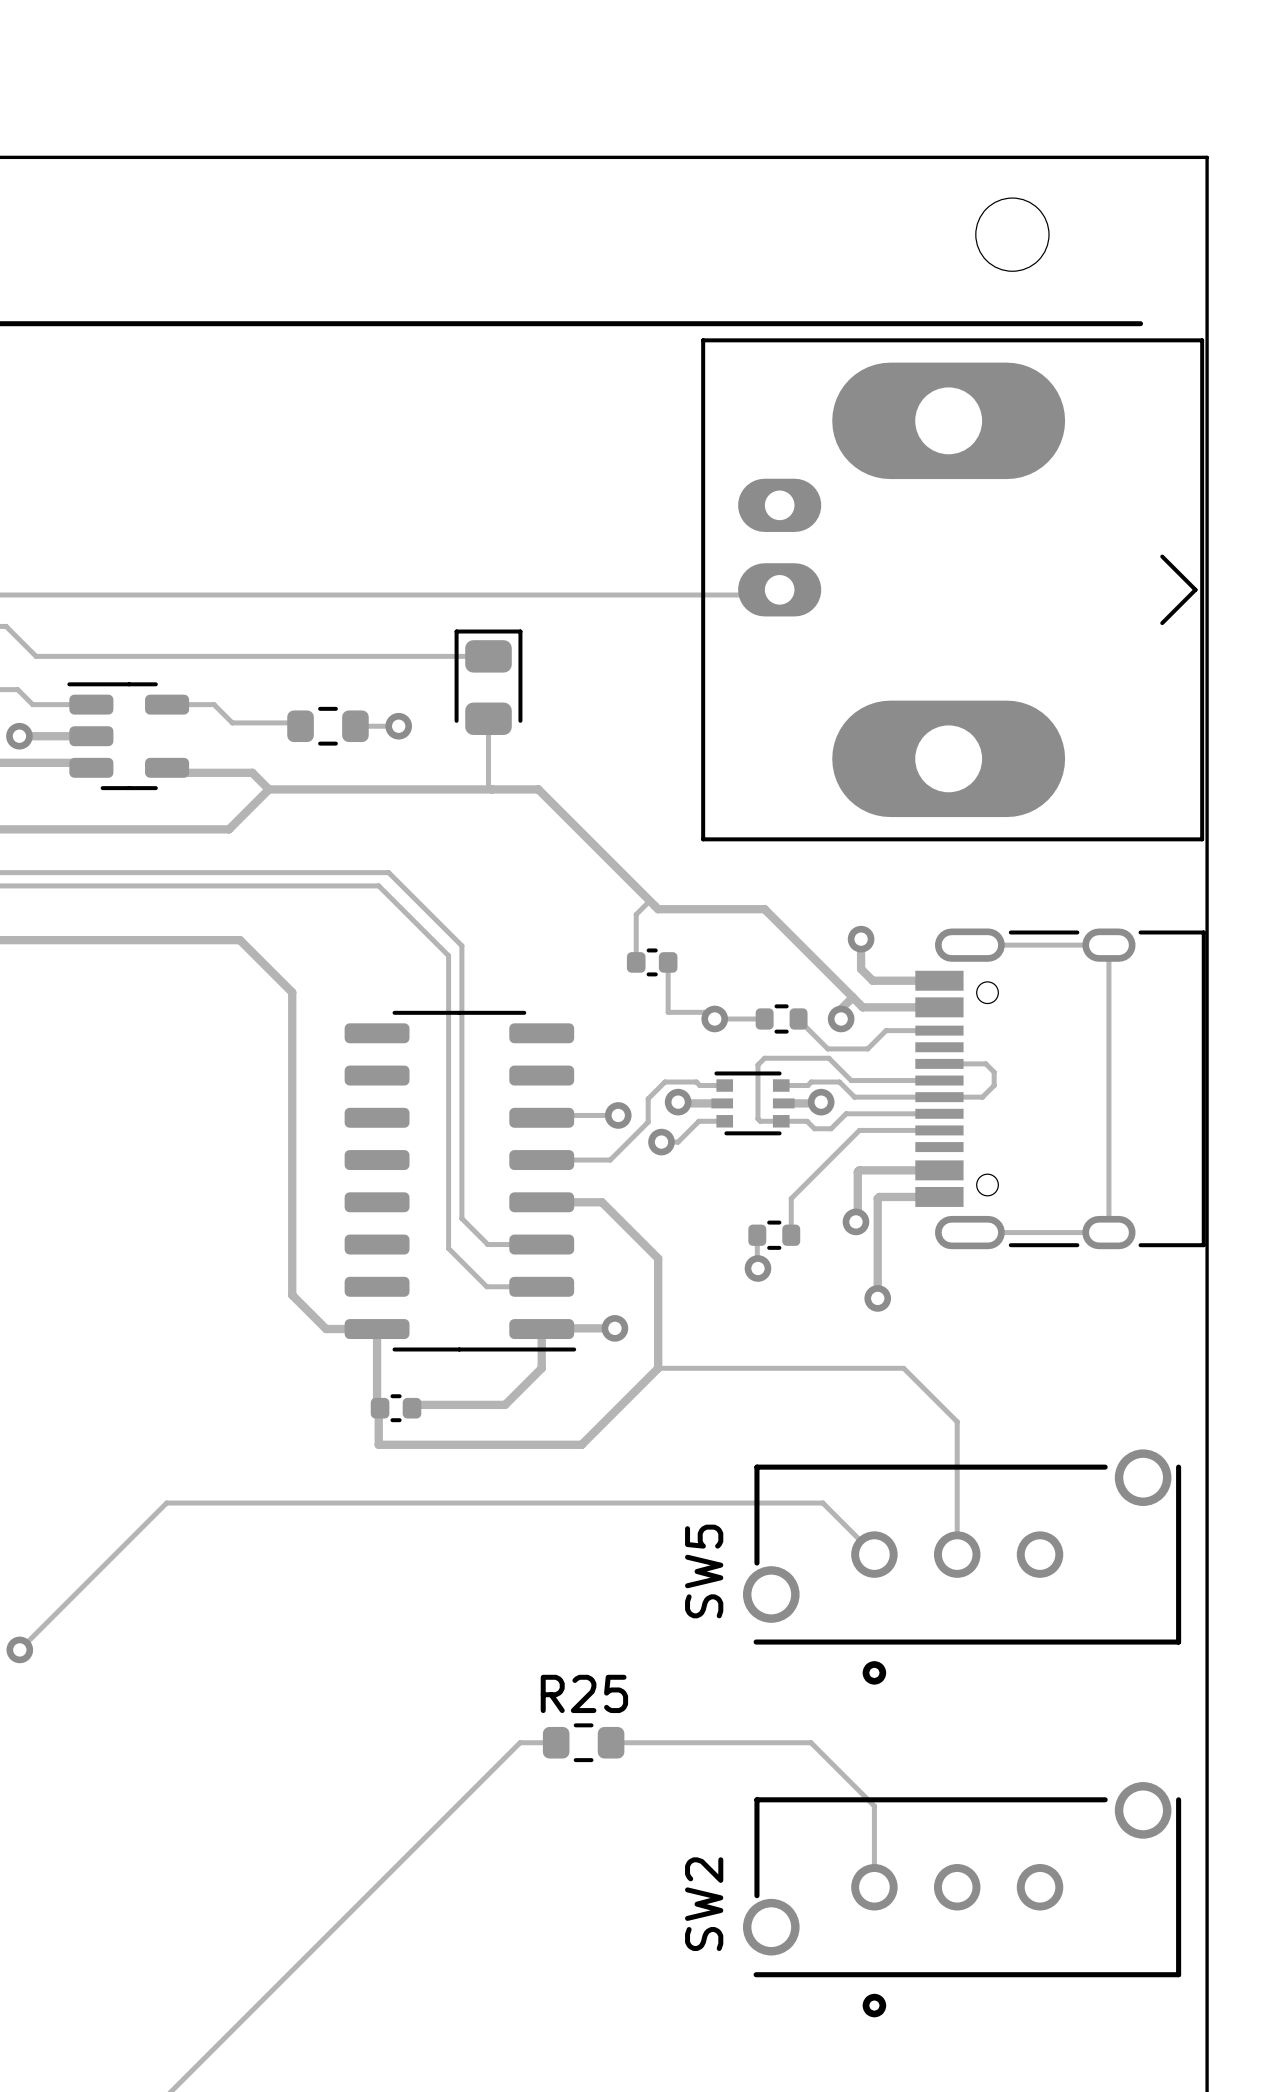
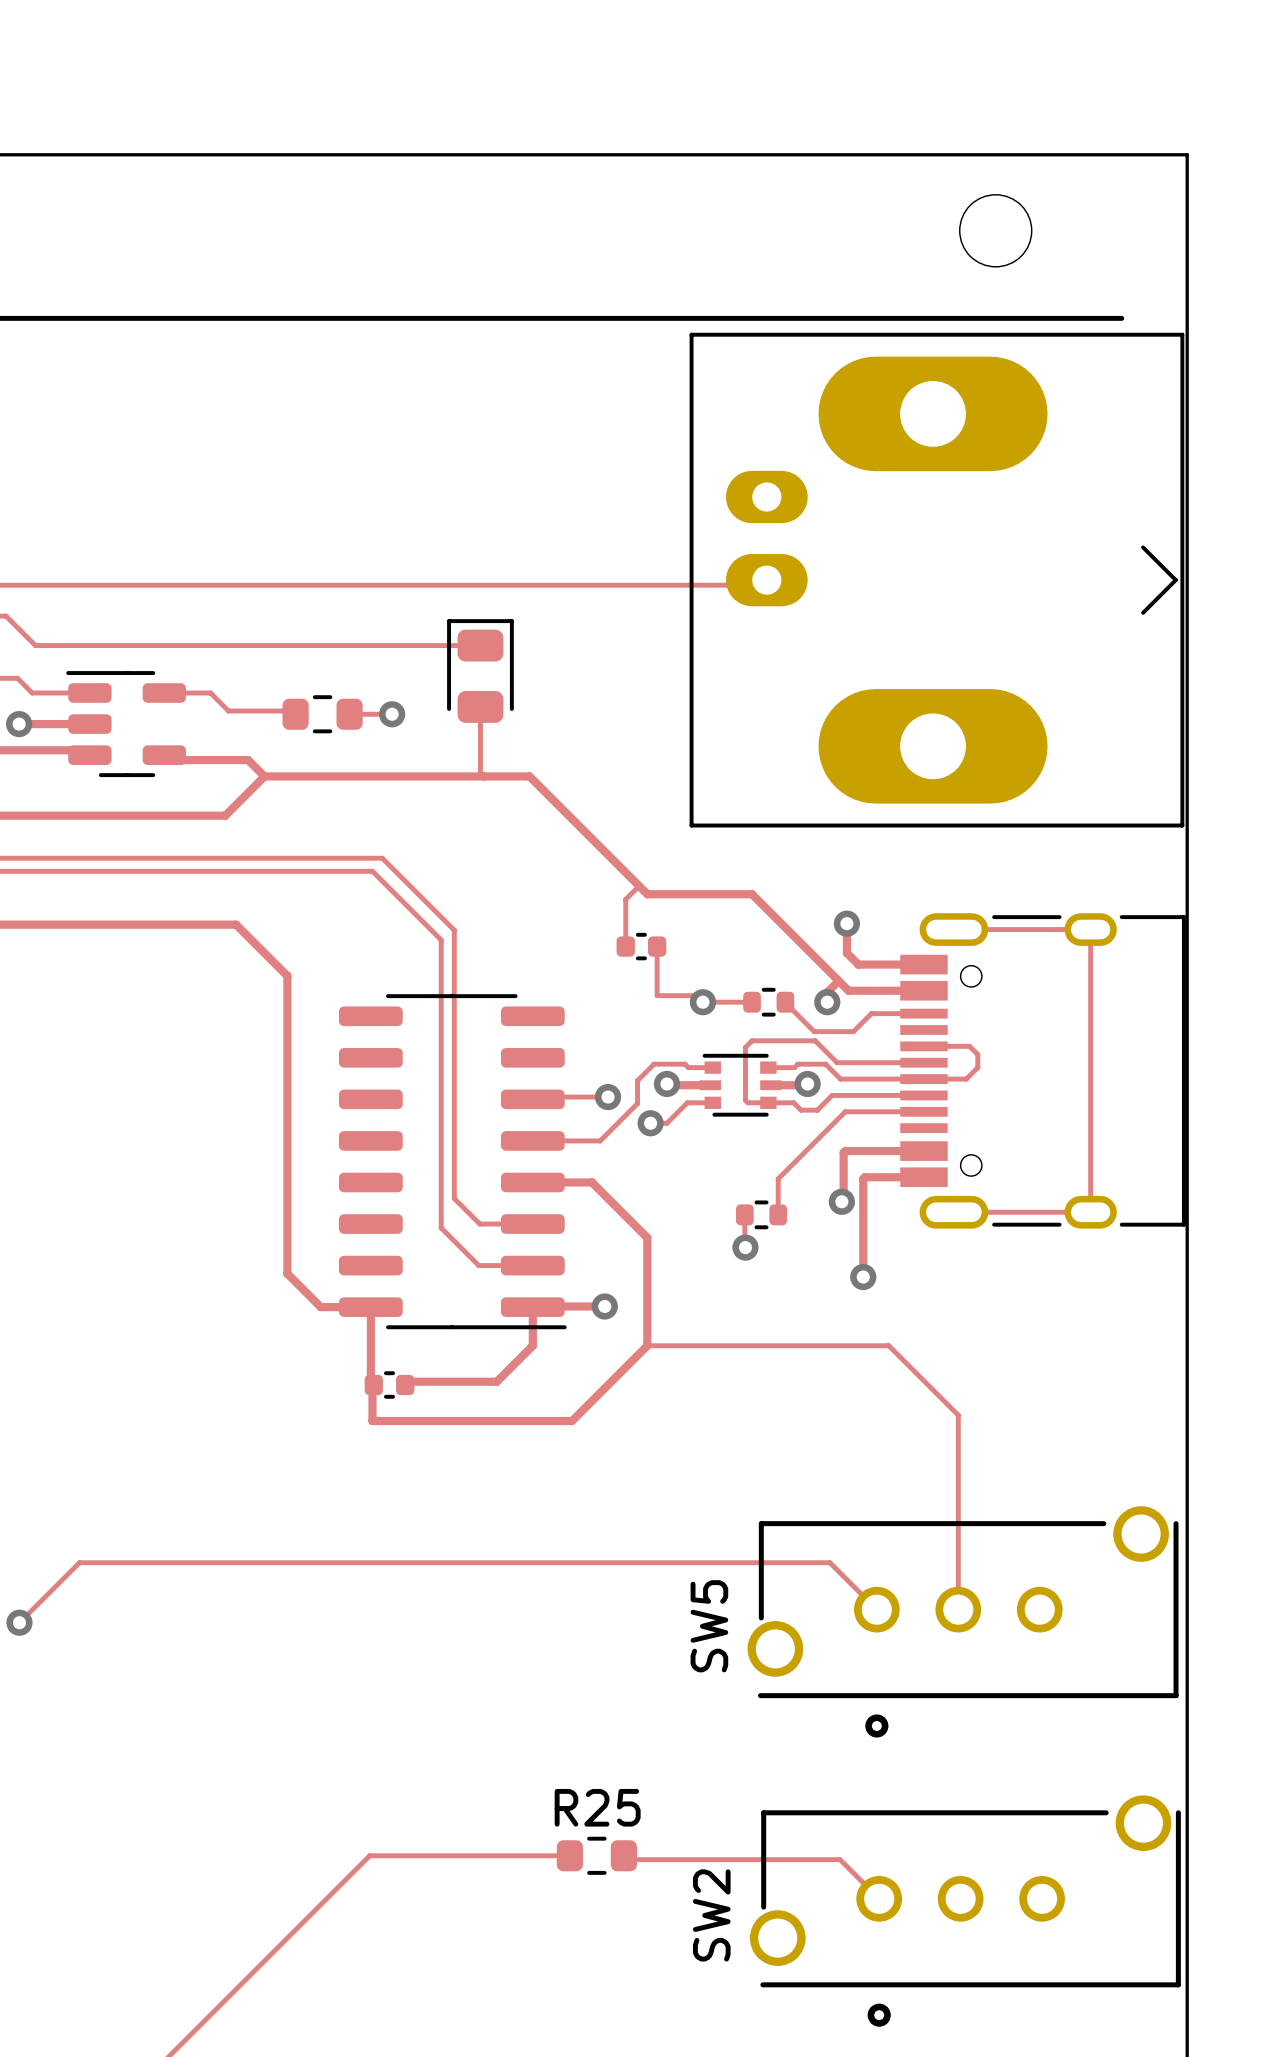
track: (957, 1421) (957, 1554) -> (941, 1398) (958, 1415) (958, 1609)
track: (874, 1554) (822, 1503) (166, 1503) (80, 1588) -> (876, 1609) (829, 1562) (79, 1562)
SW5 position: (962, 1567) -> (963, 1621)
track: (556, 1742) (520, 1742) (375, 1886) -> (569, 1855) (369, 1855)
R25 position: (583, 1742) -> (596, 1855)
track: (611, 1742) (811, 1742) (874, 1806) (874, 1887) -> none
track: none -> (623, 1855) (627, 1859) (840, 1859) (879, 1898)
SW2 position: (962, 1899) -> (965, 1911)

